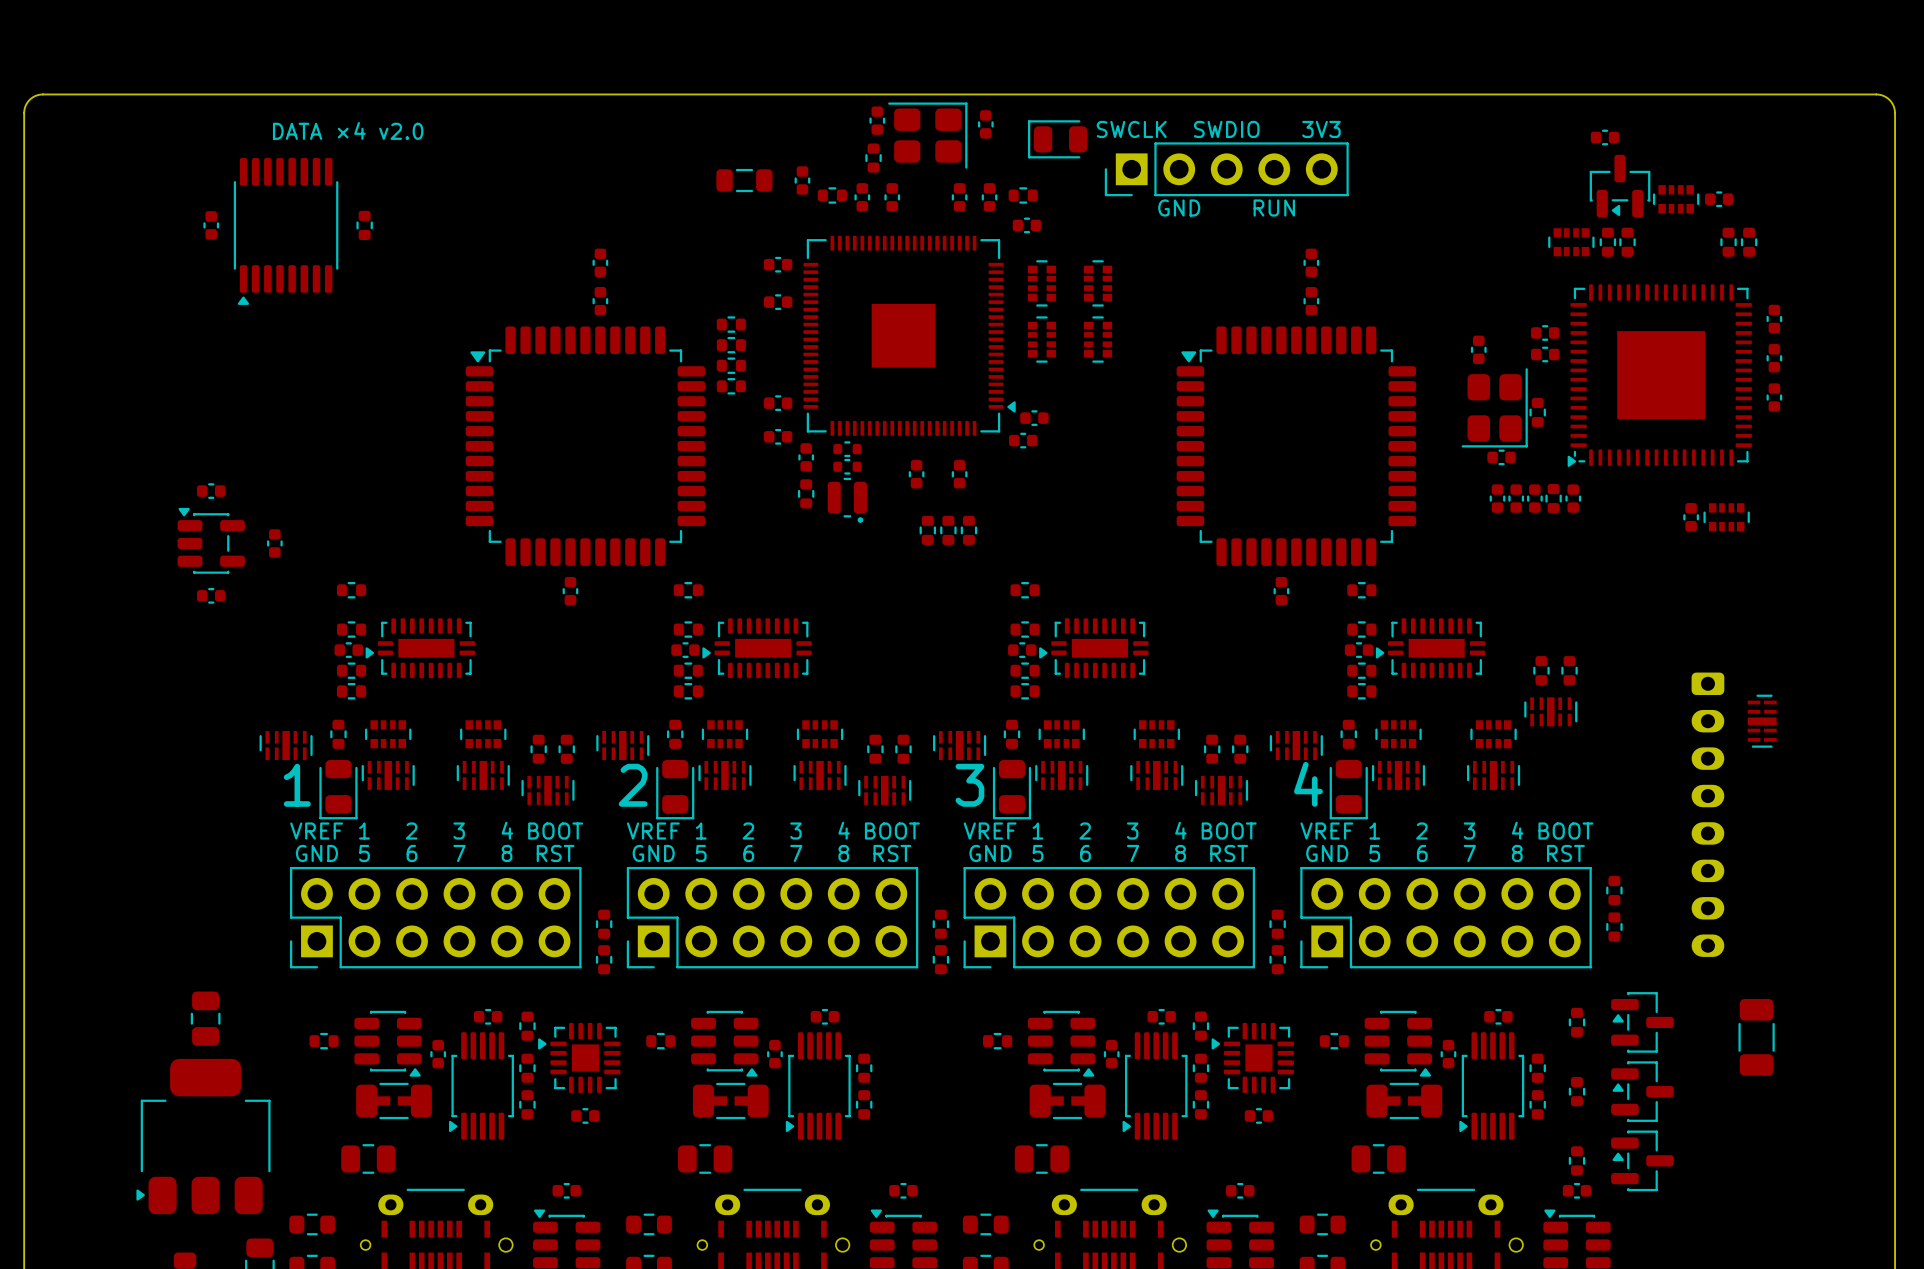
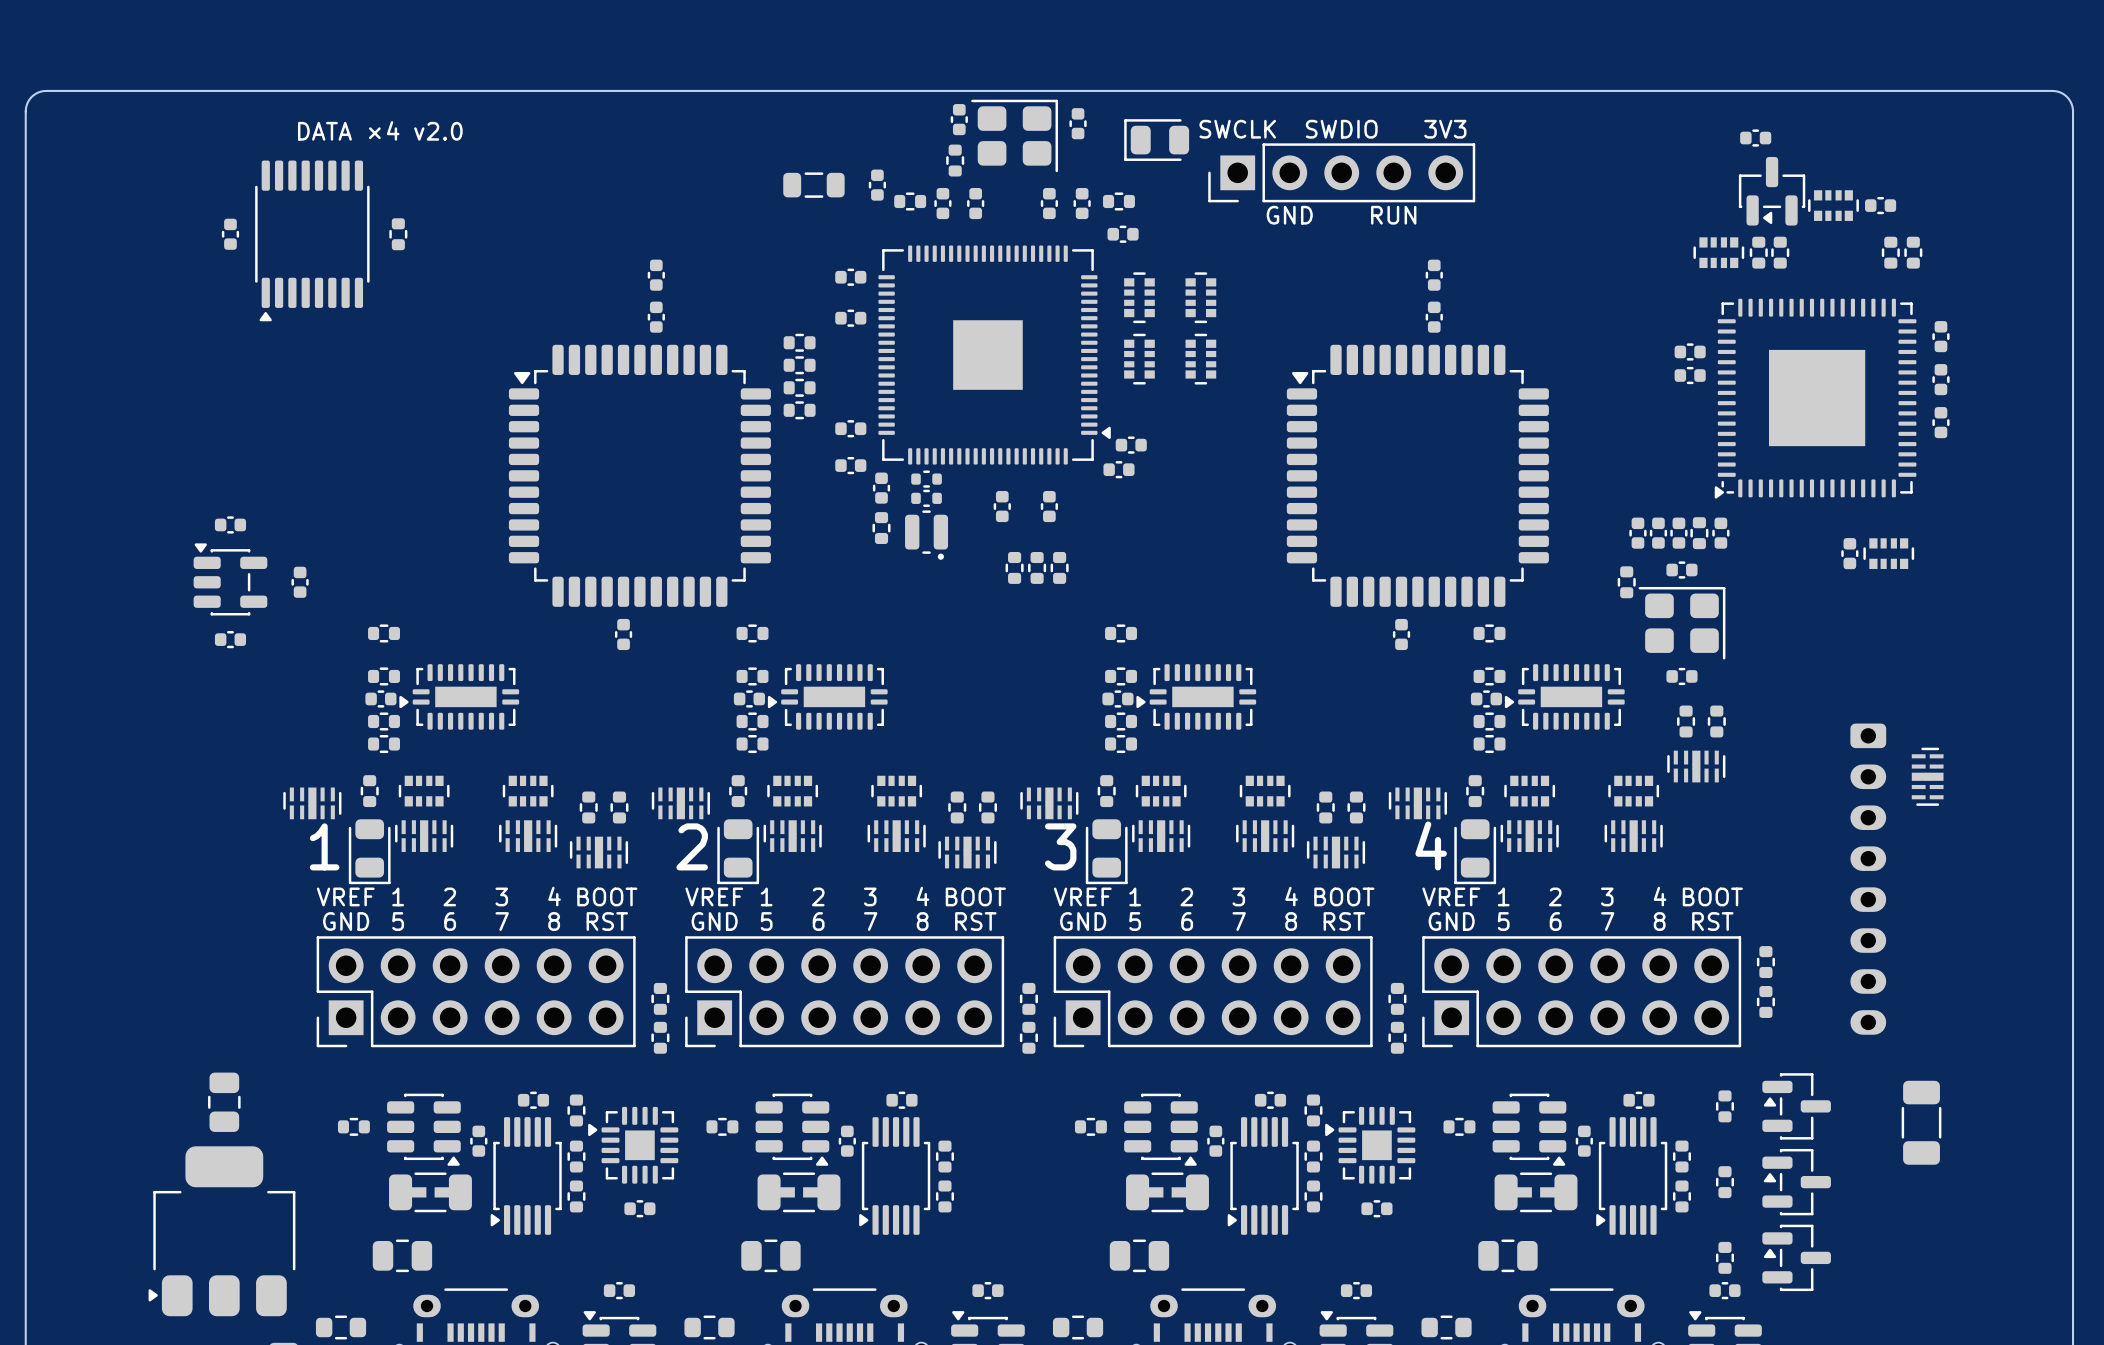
part: (1478, 349) -> none
part rotation: 0° (1494, 407) -> 90° counterclockwise (1681, 623)
part position: (1494, 407) -> (1681, 623)
part position: (1537, 412) -> (1626, 582)
part position: (1501, 457) -> (1681, 570)
part: none -> (1681, 676)

